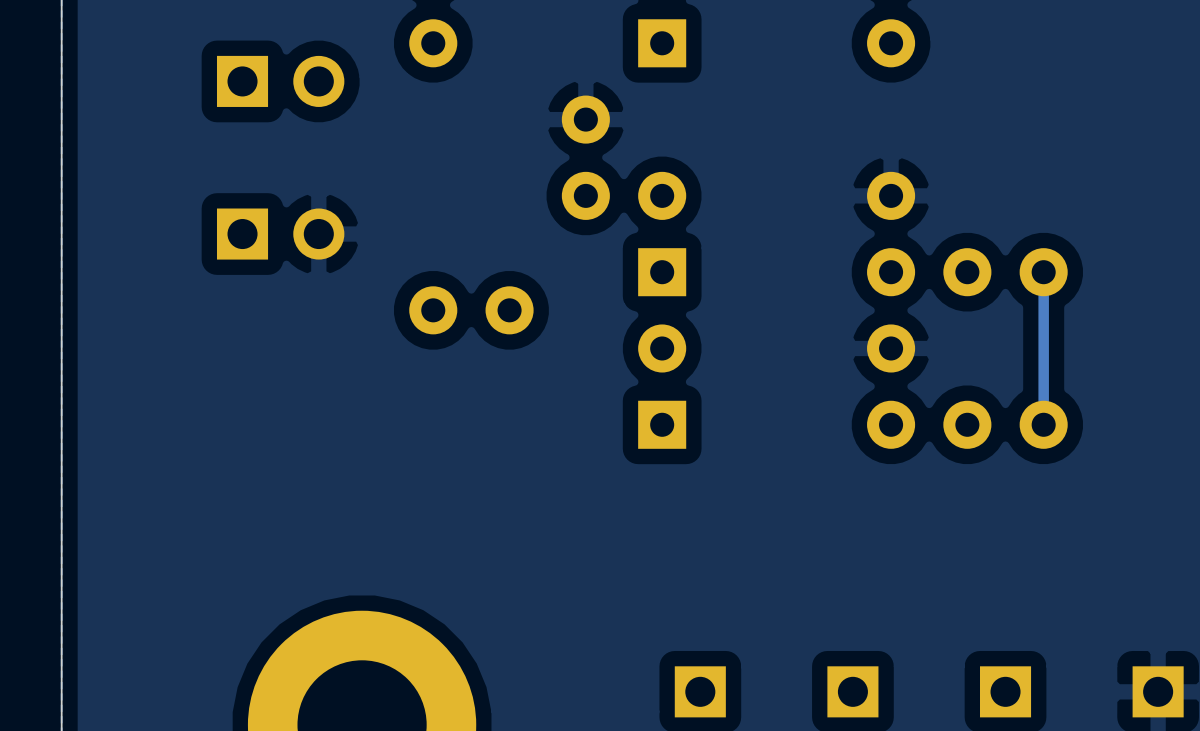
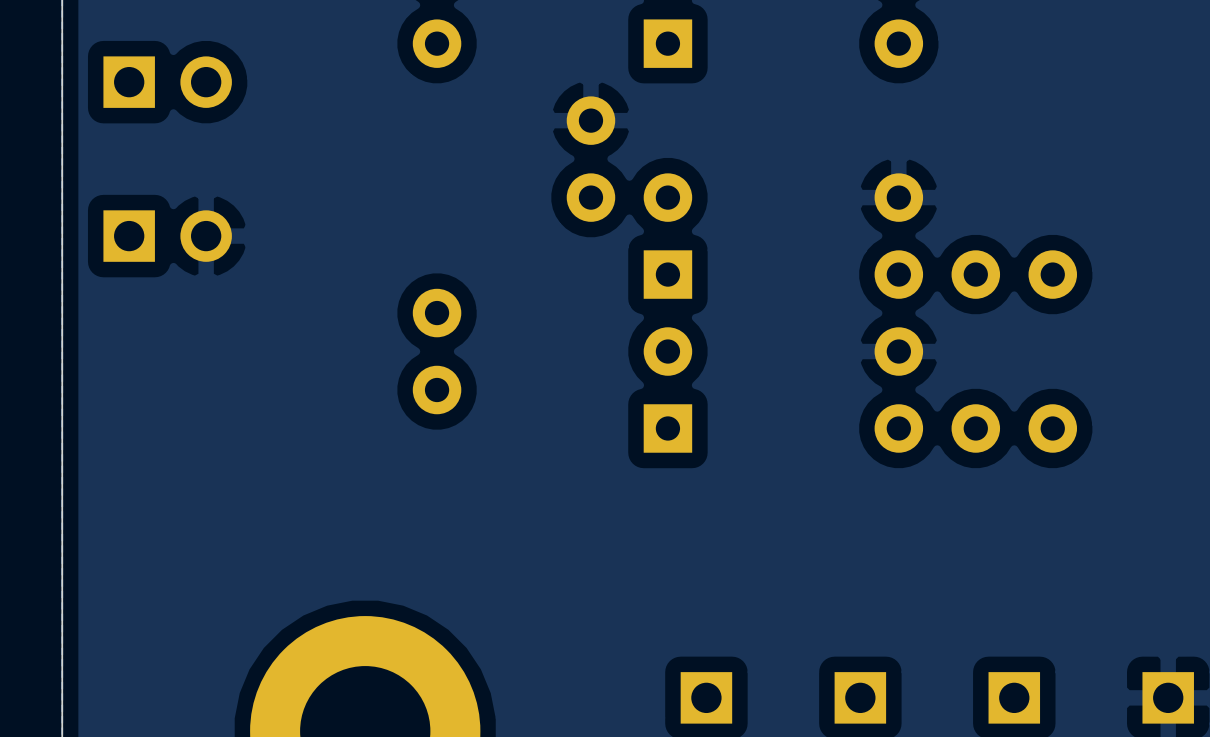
part: none -> (167, 82)
part: (280, 81) -> none
part: none -> (167, 236)
part: (280, 234) -> none
track: (1043, 272) (1043, 424) -> none
part rotation: 0° (471, 310) -> 90° clockwise (437, 351)

